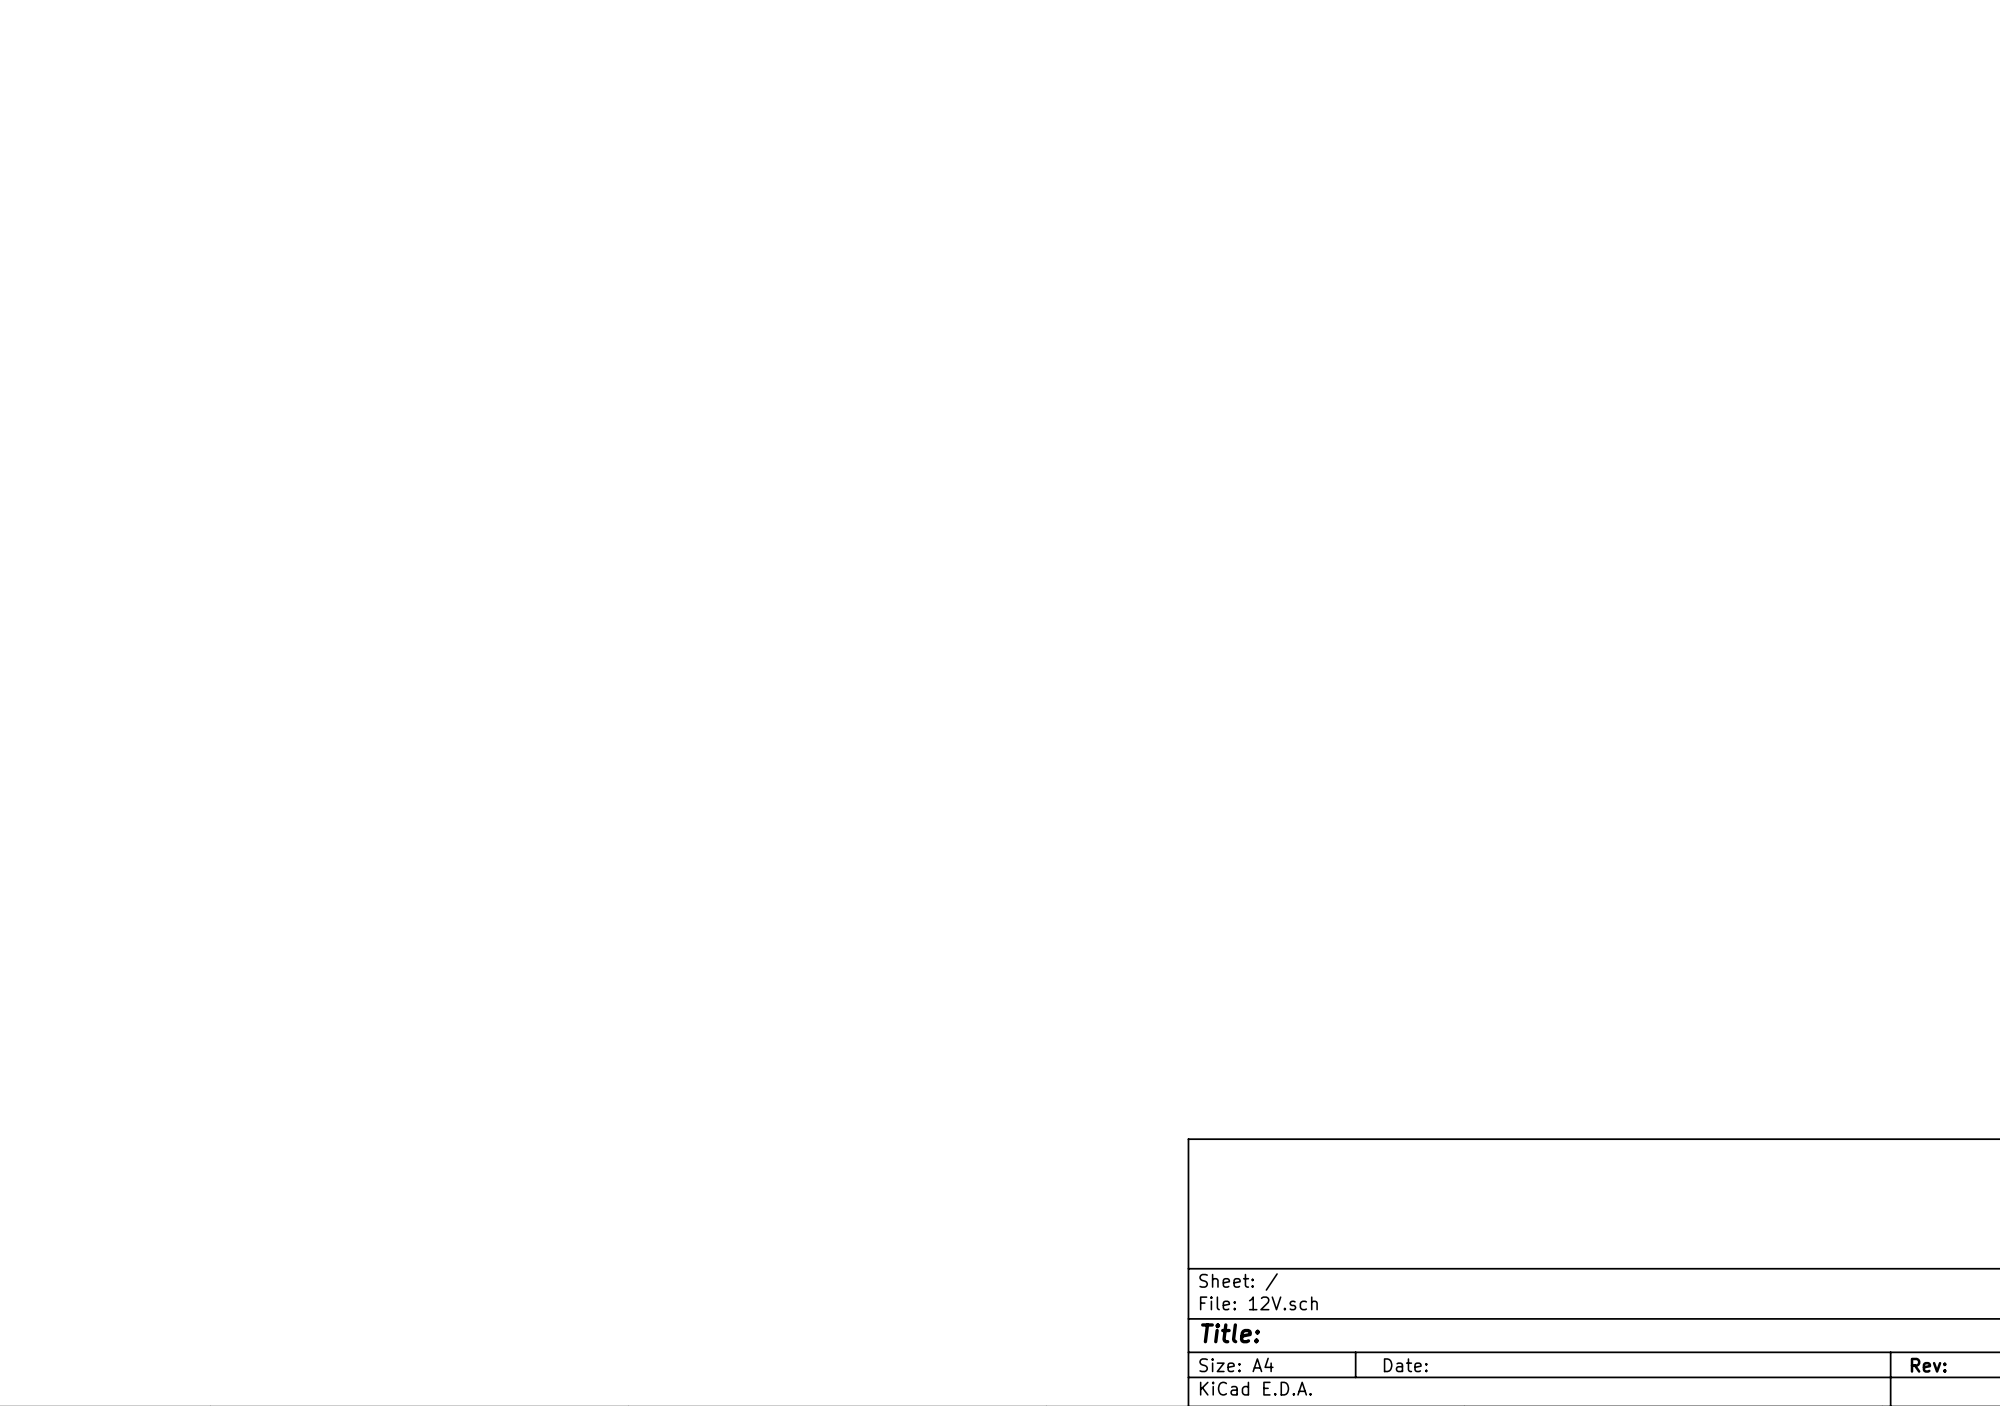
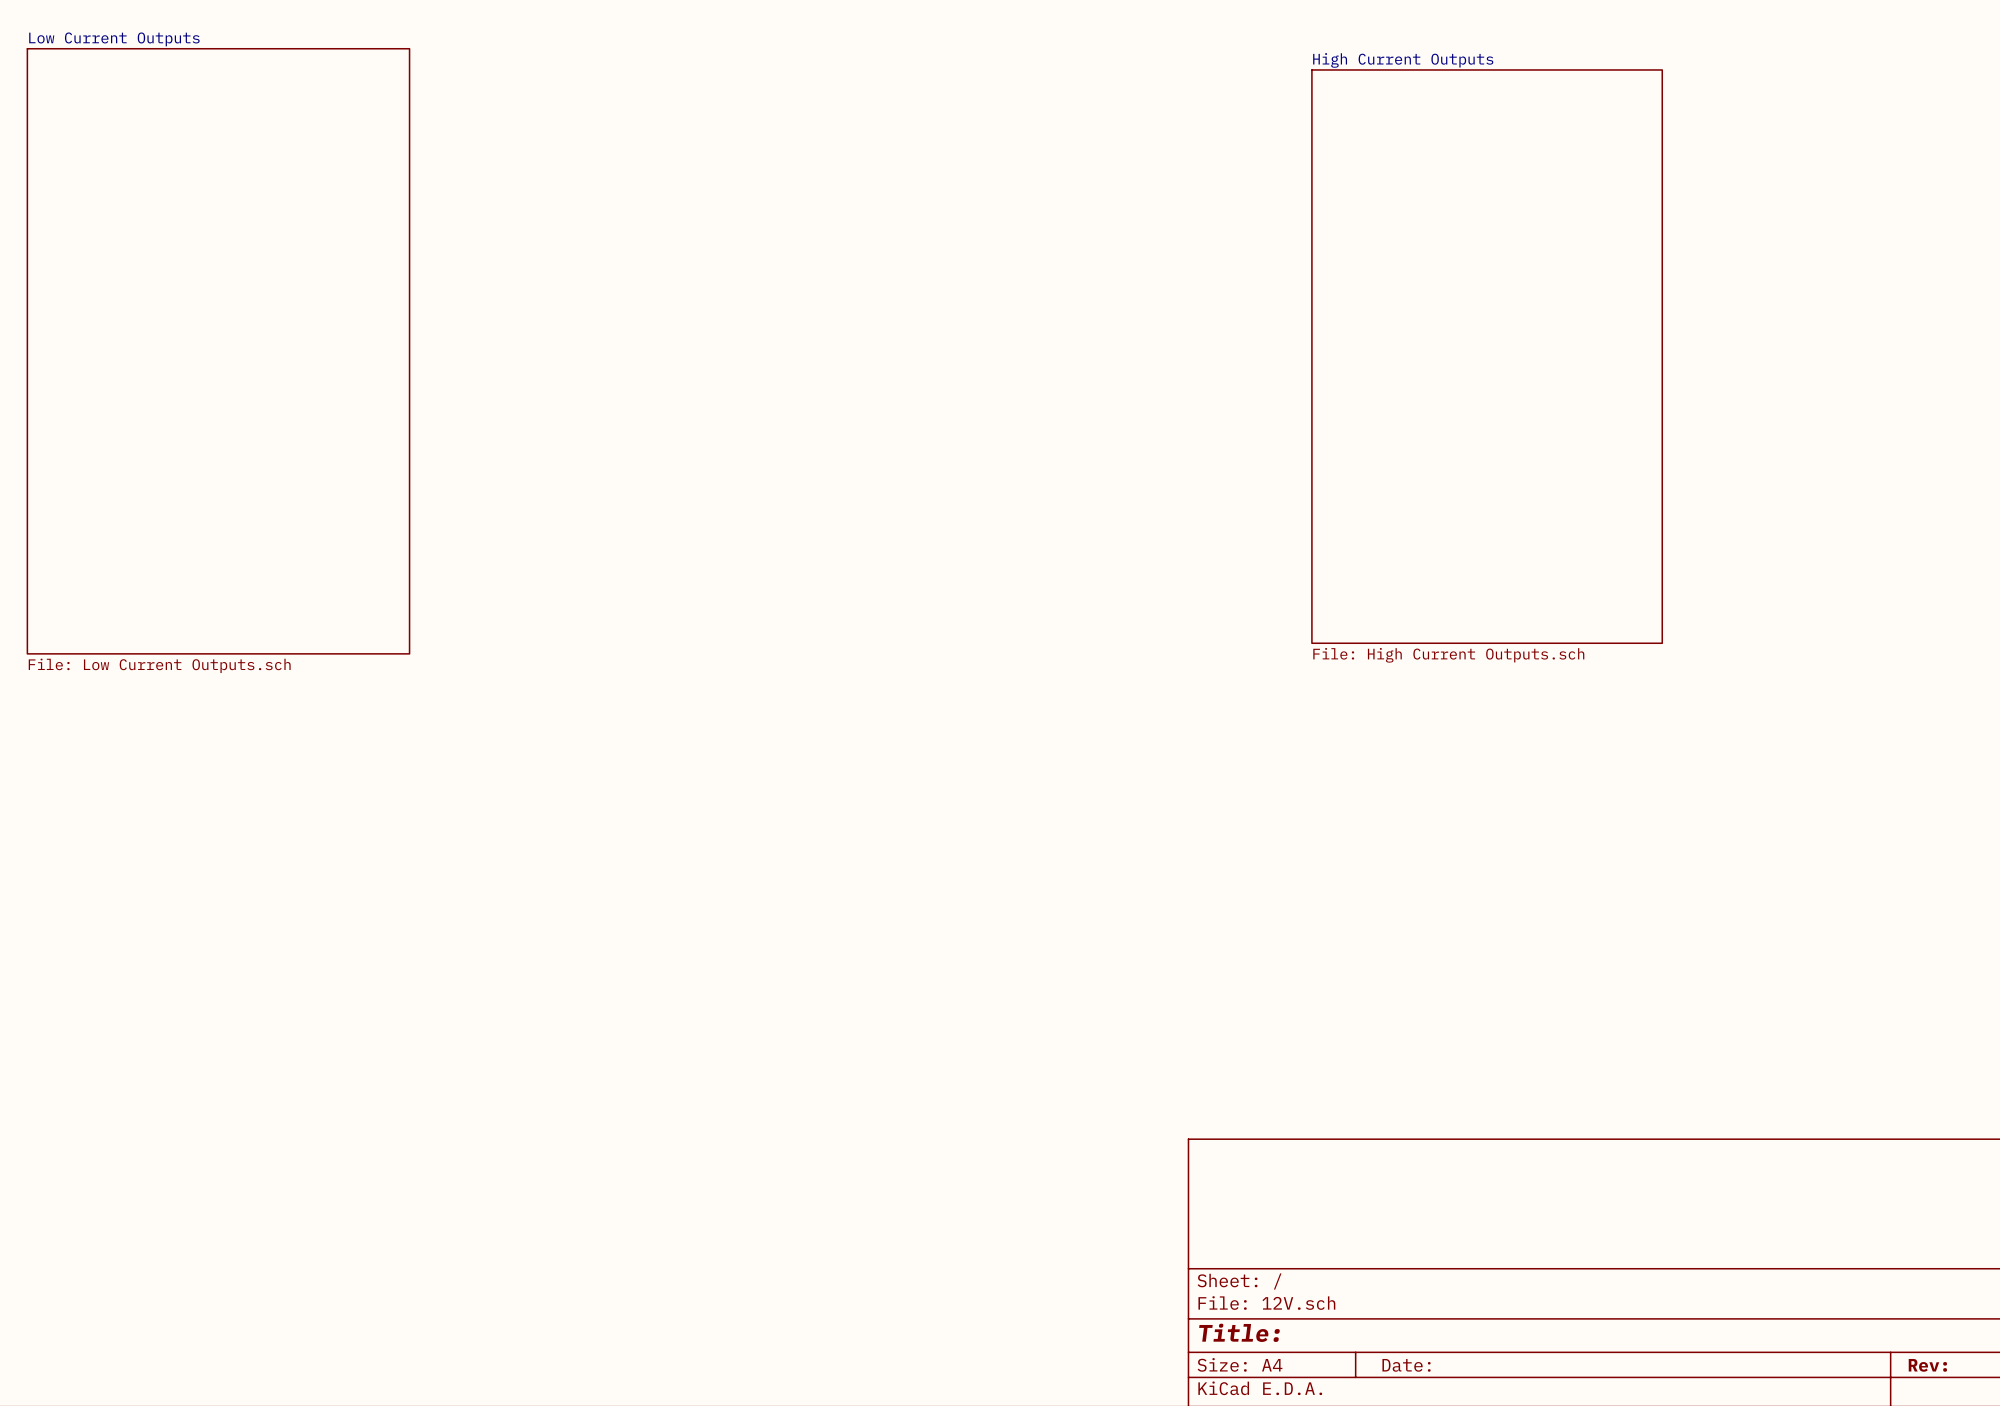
sheet Low Current Outputs: none -> File: Low Current Outputs.sch (218, 351)
sheet High Current Outputs: none -> File: High Current Outputs.sch (1487, 356)

